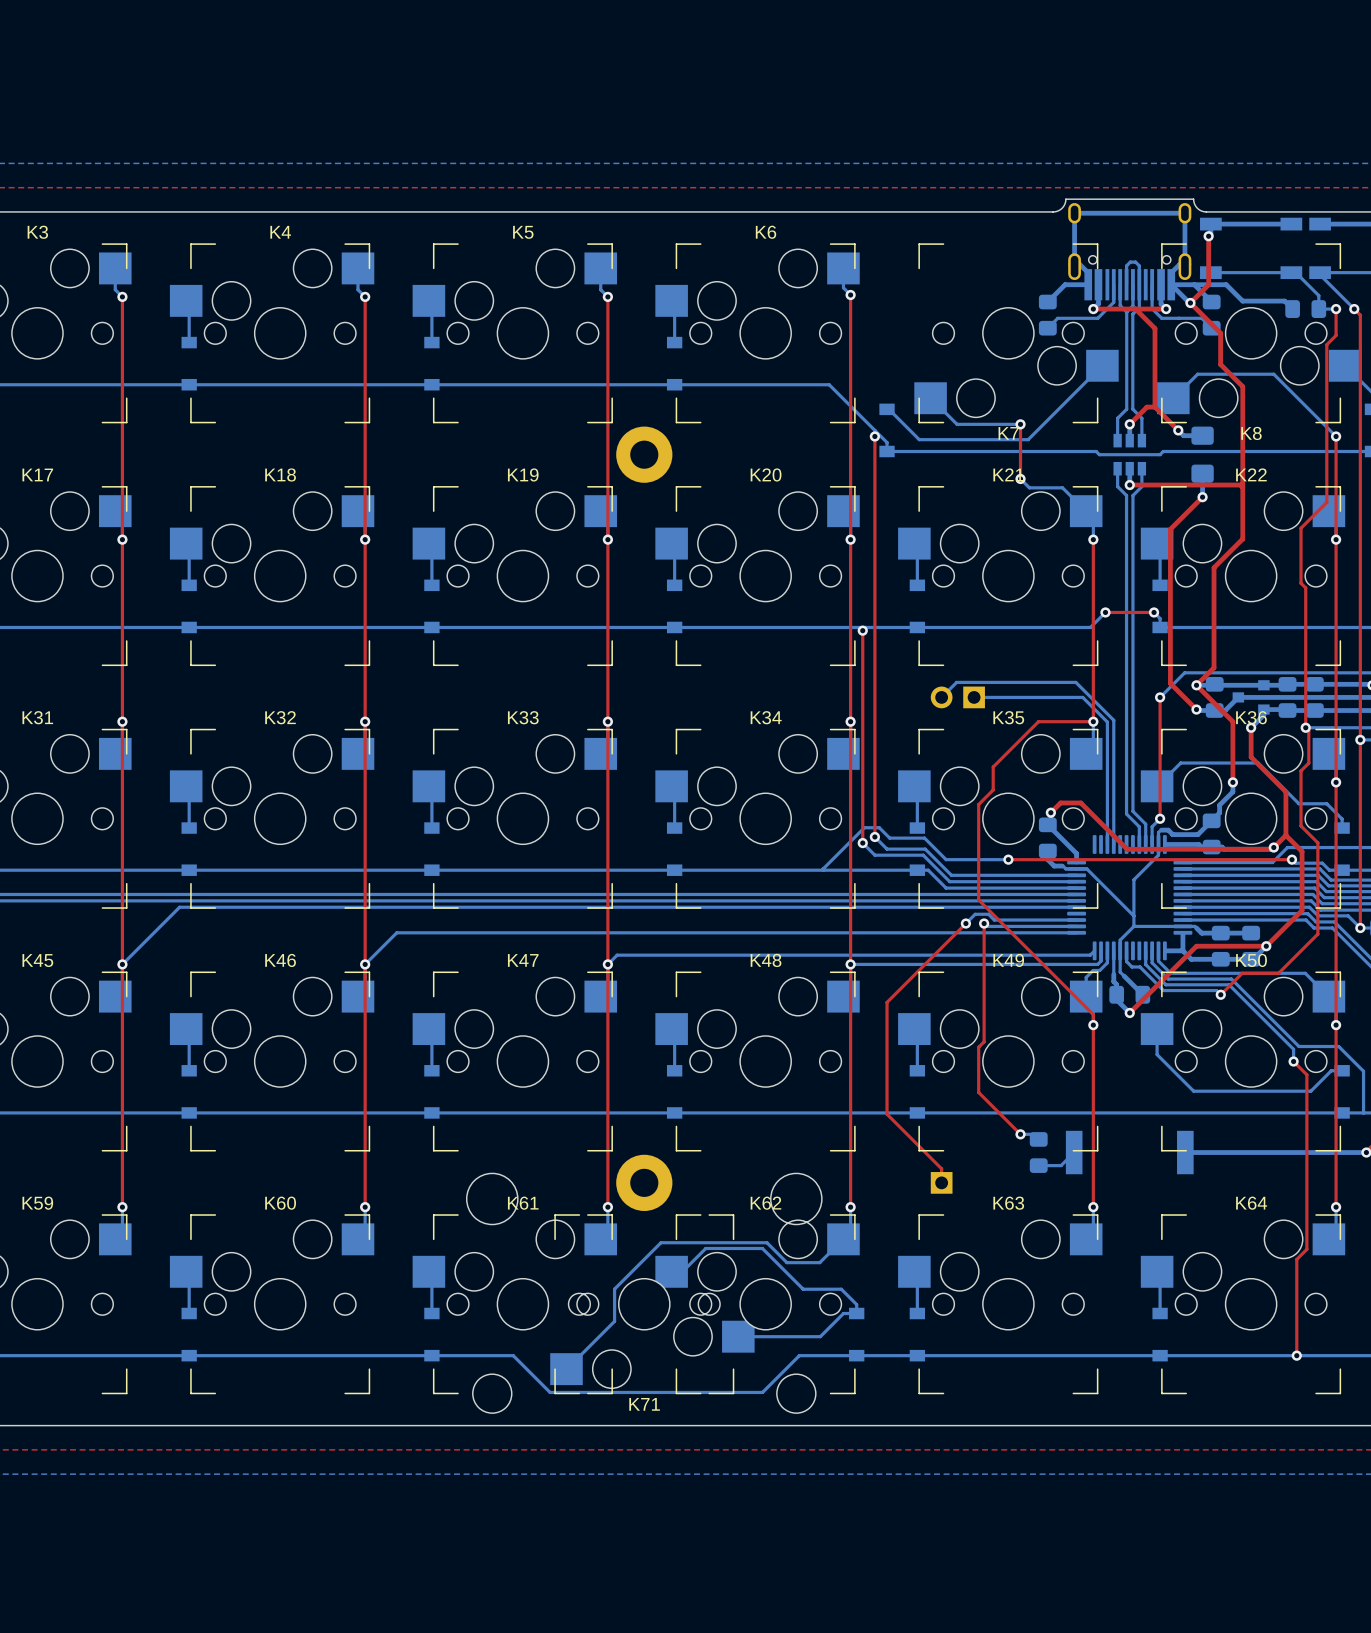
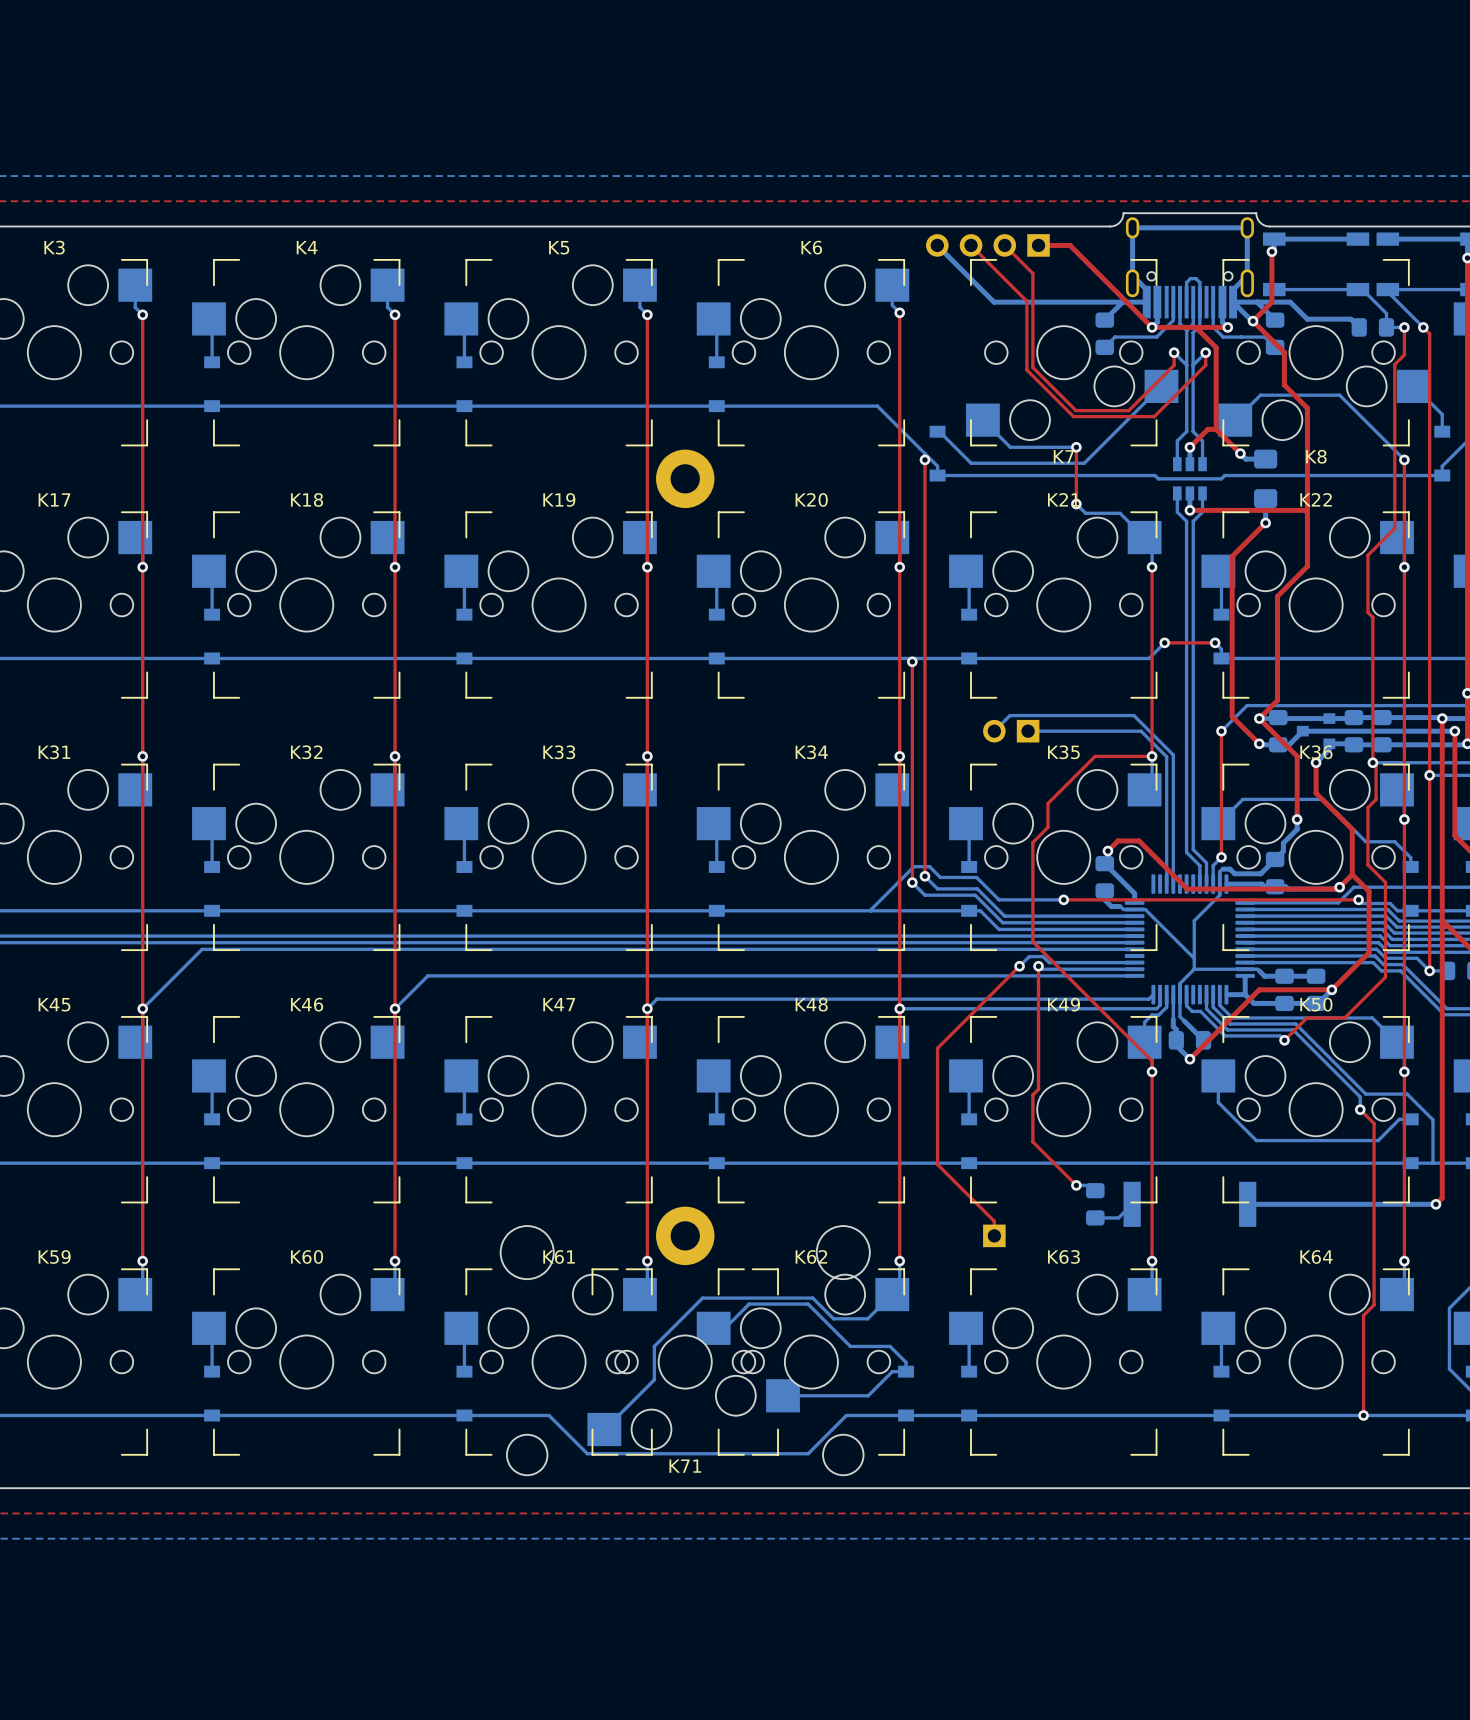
bottom track: none -> (937, 245) (994, 302) (1122, 302)
top track: none -> (971, 245) (1026, 301) (1026, 369) (1073, 416) (1154, 416) (1205, 365) (1205, 352)
part: none -> (987, 245)
top track: none -> (1004, 245) (1032, 273) (1032, 367) (1076, 410) (1128, 410) (1174, 365) (1174, 352)
top track: none -> (1038, 245) (1070, 245) (1152, 327)
bottom track: none -> (1174, 352) (1186, 365)
via: none -> (1174, 352)
bottom track: none -> (1205, 352) (1193, 365)
via: none -> (1205, 352)

